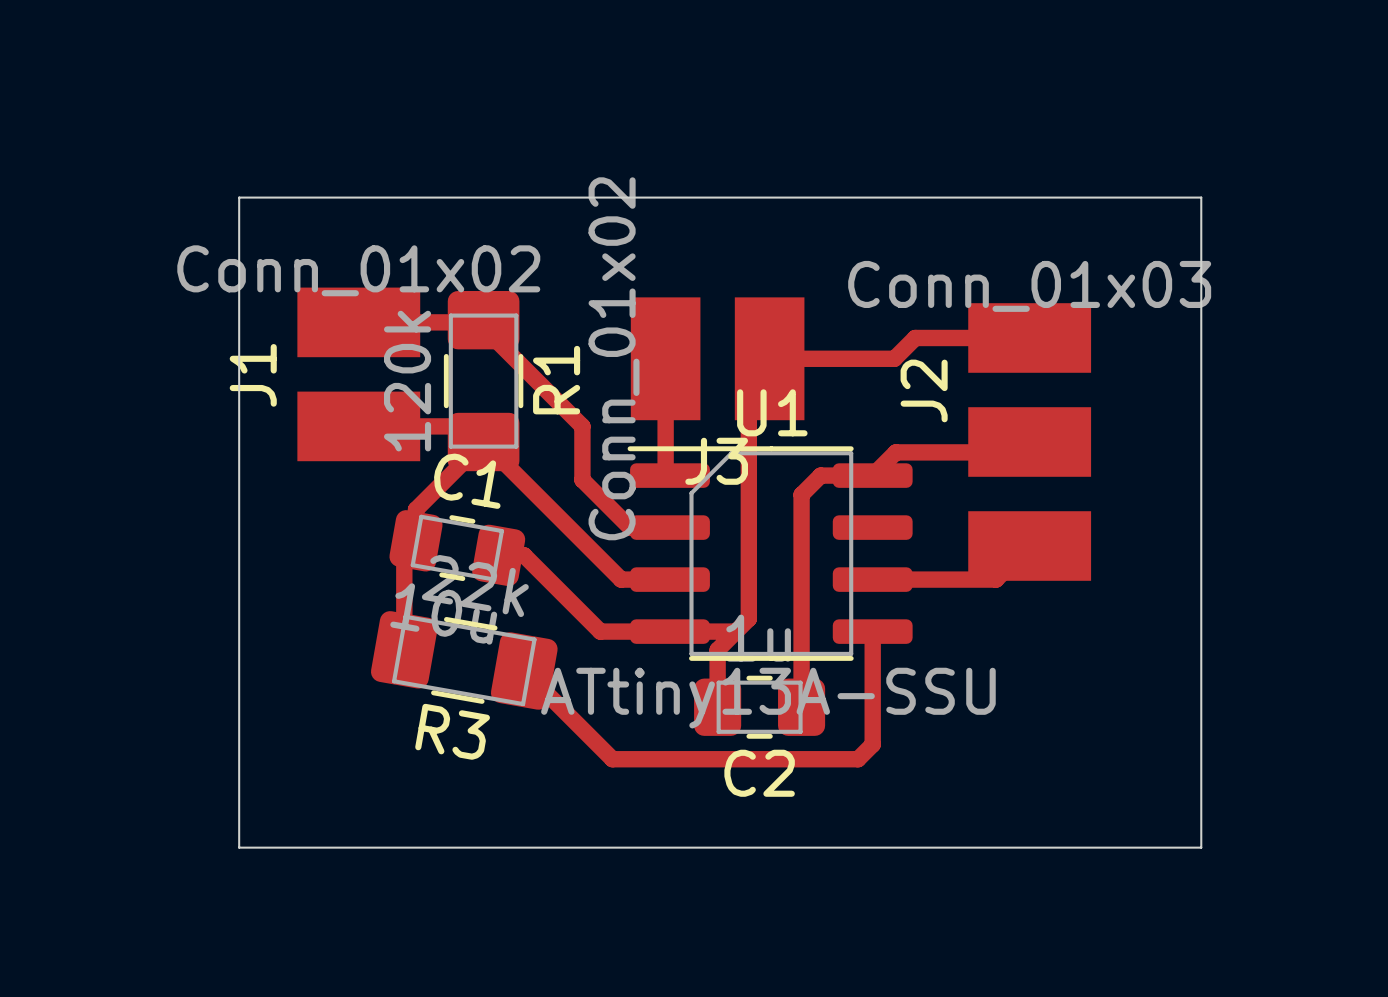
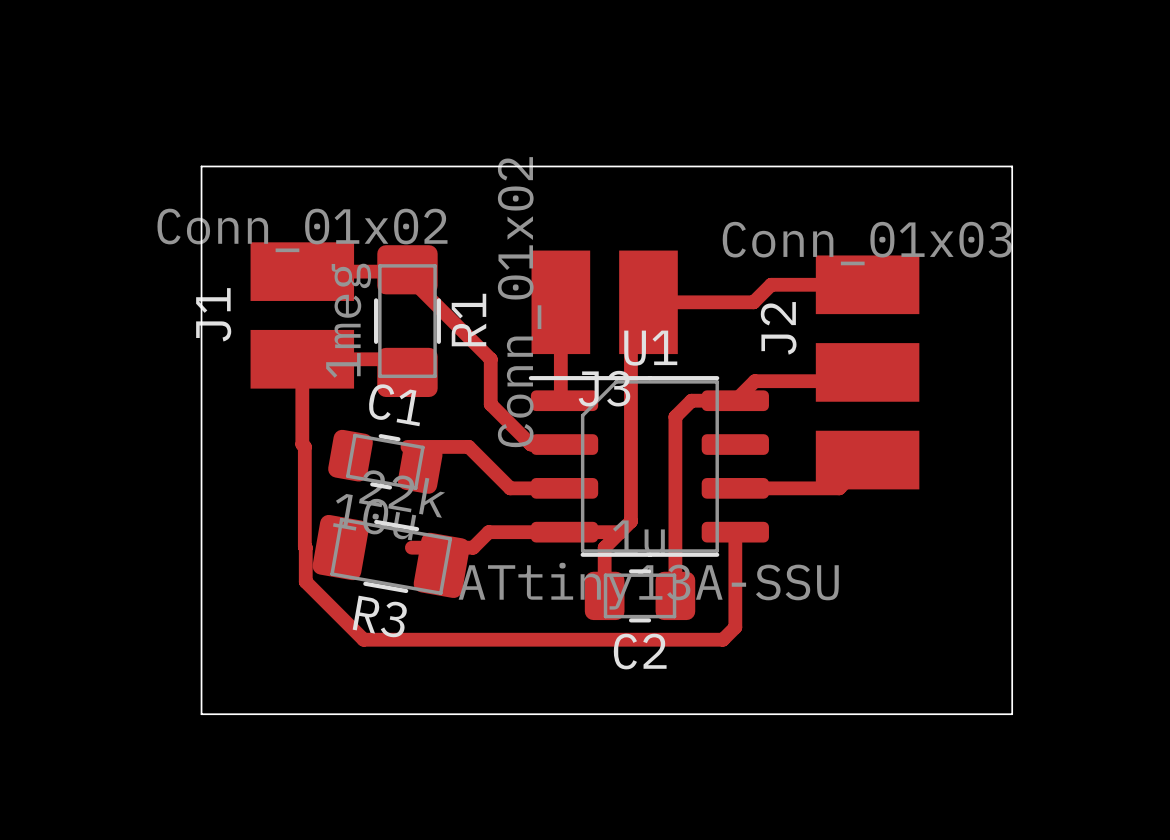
R1 value: 120k (407, 381) -> 1meg (348, 320)
track: (498, 555) (524, 555) (600, 631) -> (411, 547) (473, 547) (488, 532) (505, 532)
track: (621, 579) (483, 442) (415, 509) (415, 540) (404, 552) (404, 649) -> (523, 488) (510, 488) (468, 446) (407, 446)
track: (524, 671) (612, 759) -> (302, 359) (305, 581) (363, 639) (516, 639)

